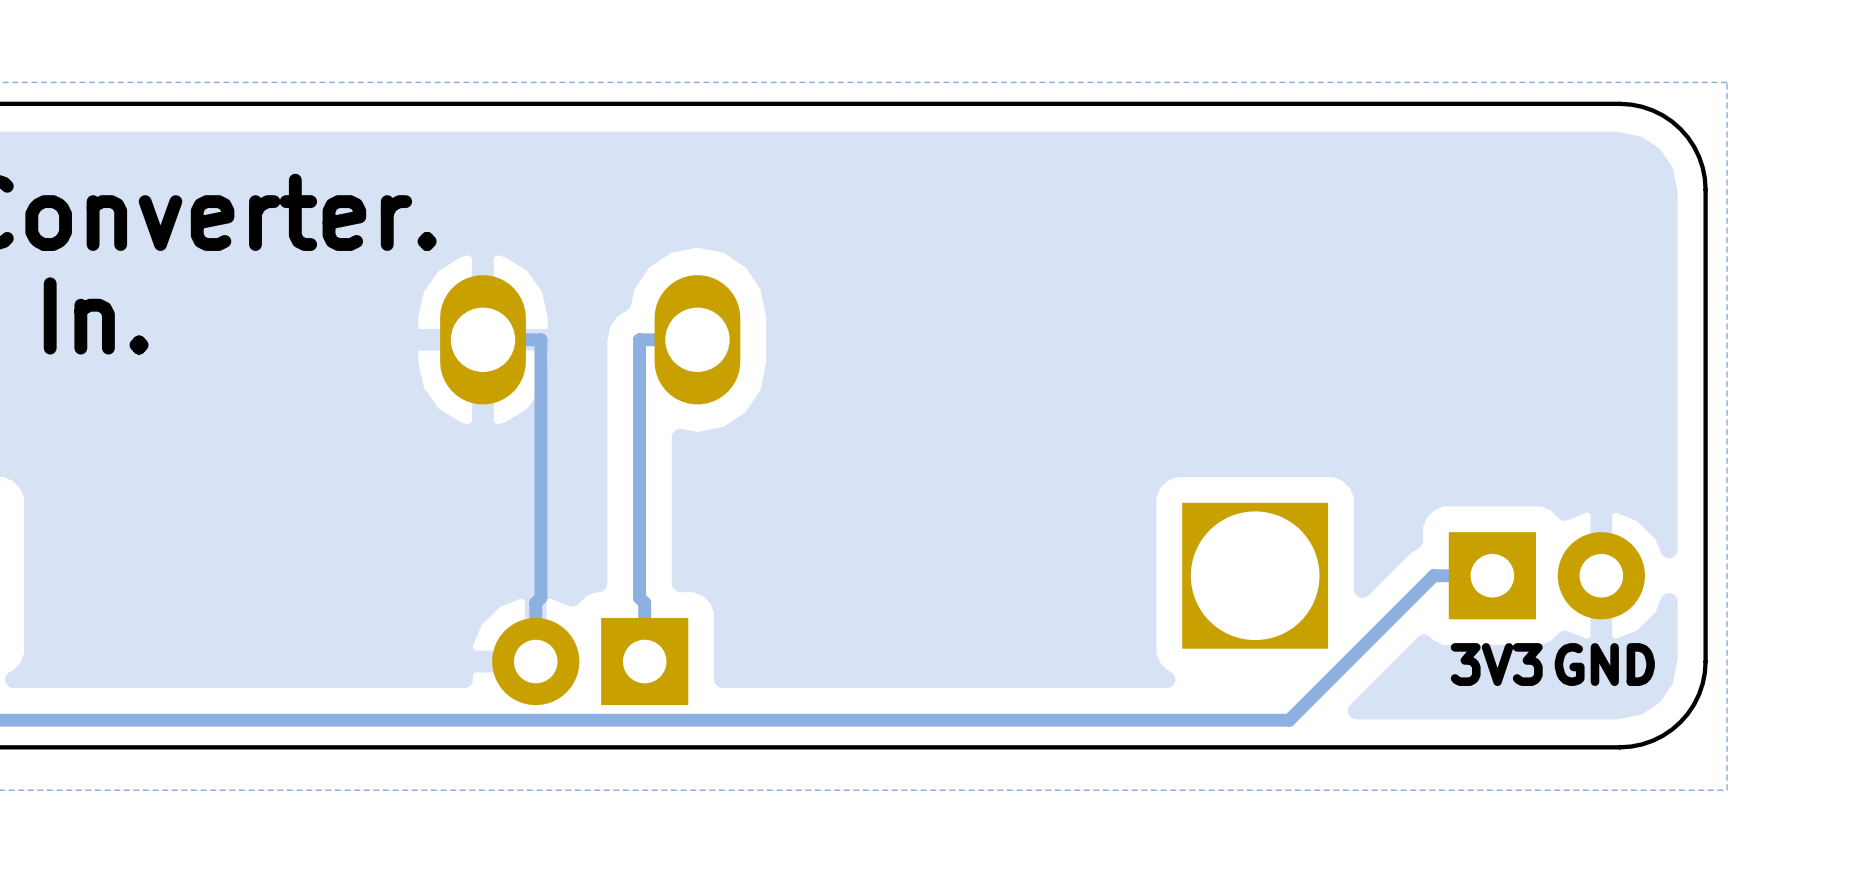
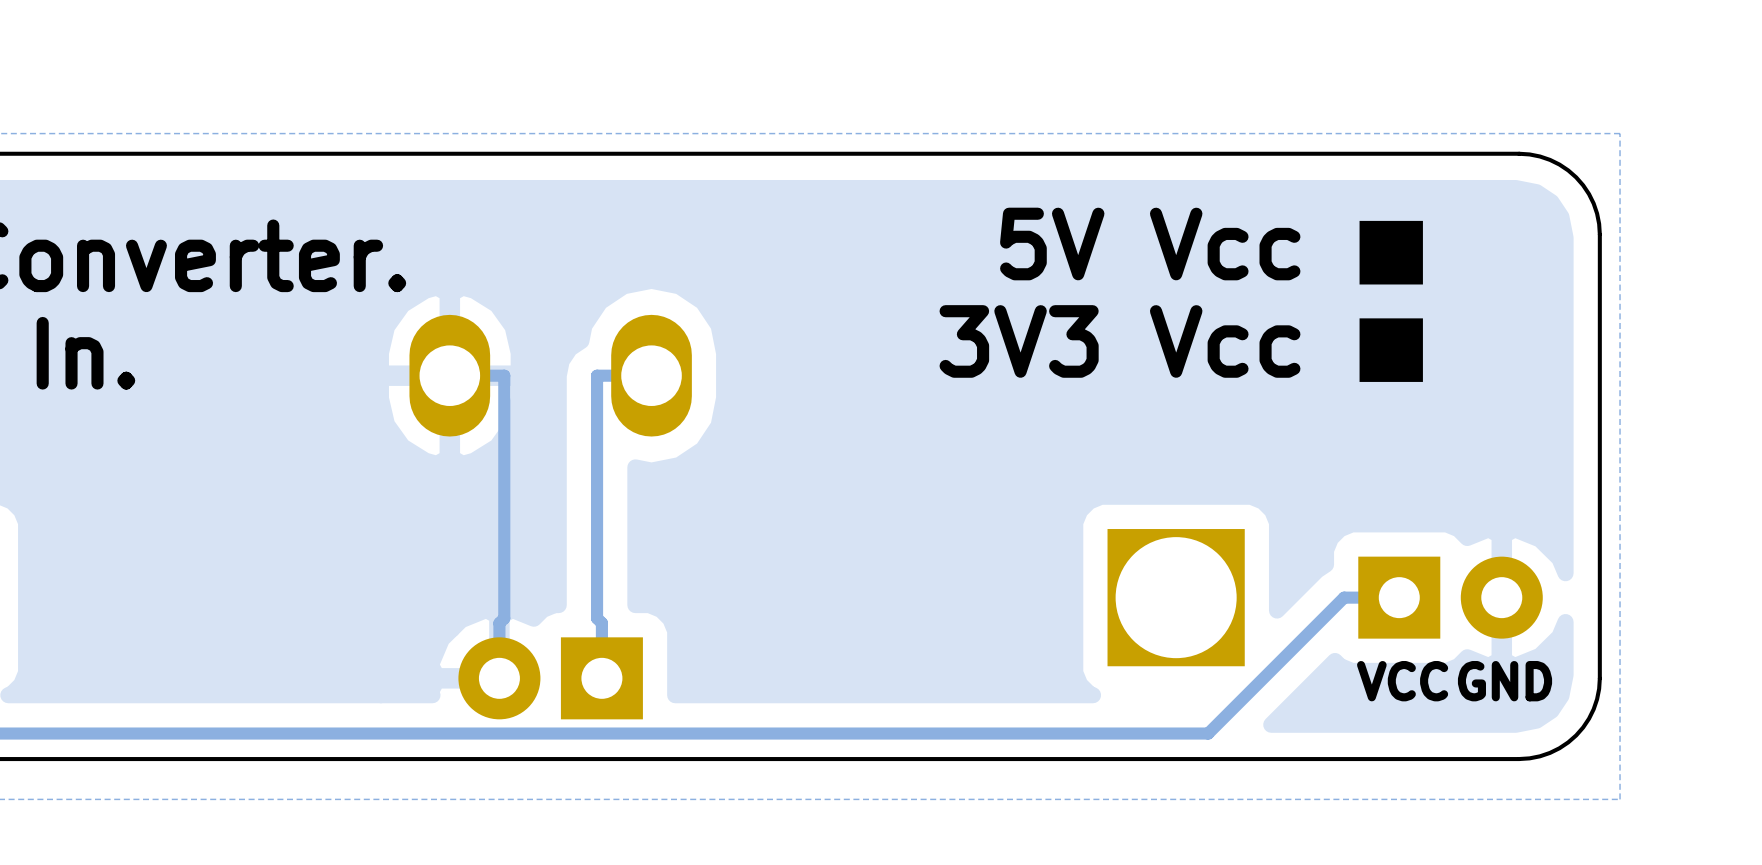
text: none -> 5V Vcc ■ (1214, 249)
text: none -> 3V3 Vcc ■ (1184, 346)
text: 3V3 (1496, 664) -> VCC (1402, 681)

